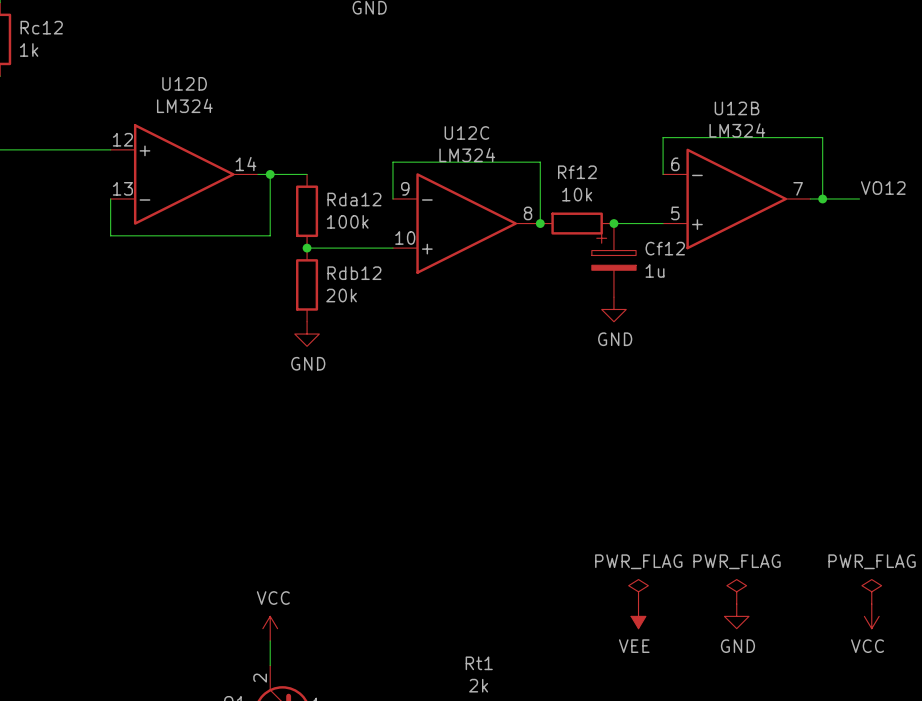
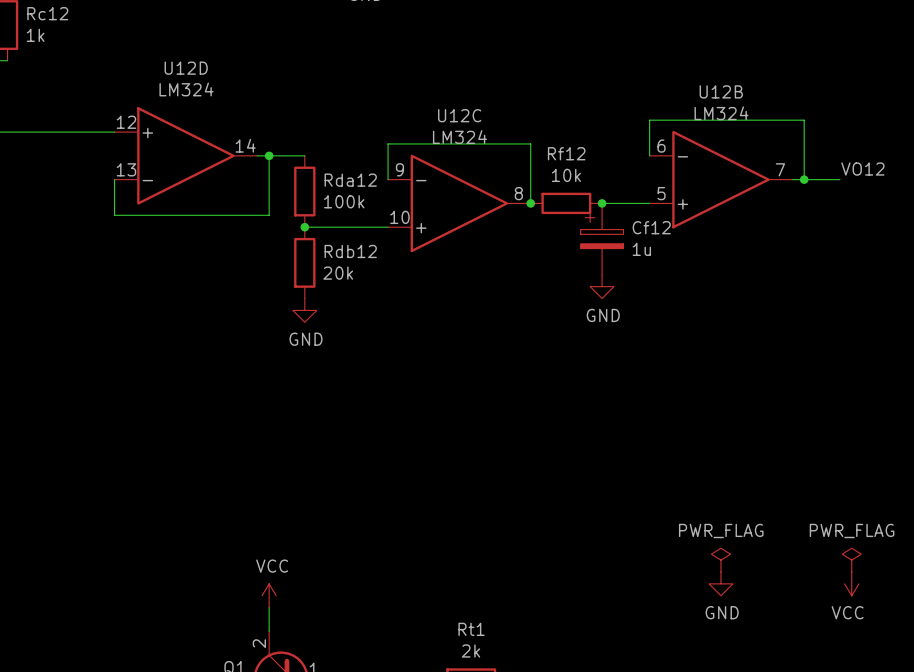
power symbol: PWR_FLAG (638, 591) -> none
power symbol: VEE (638, 616) -> none

